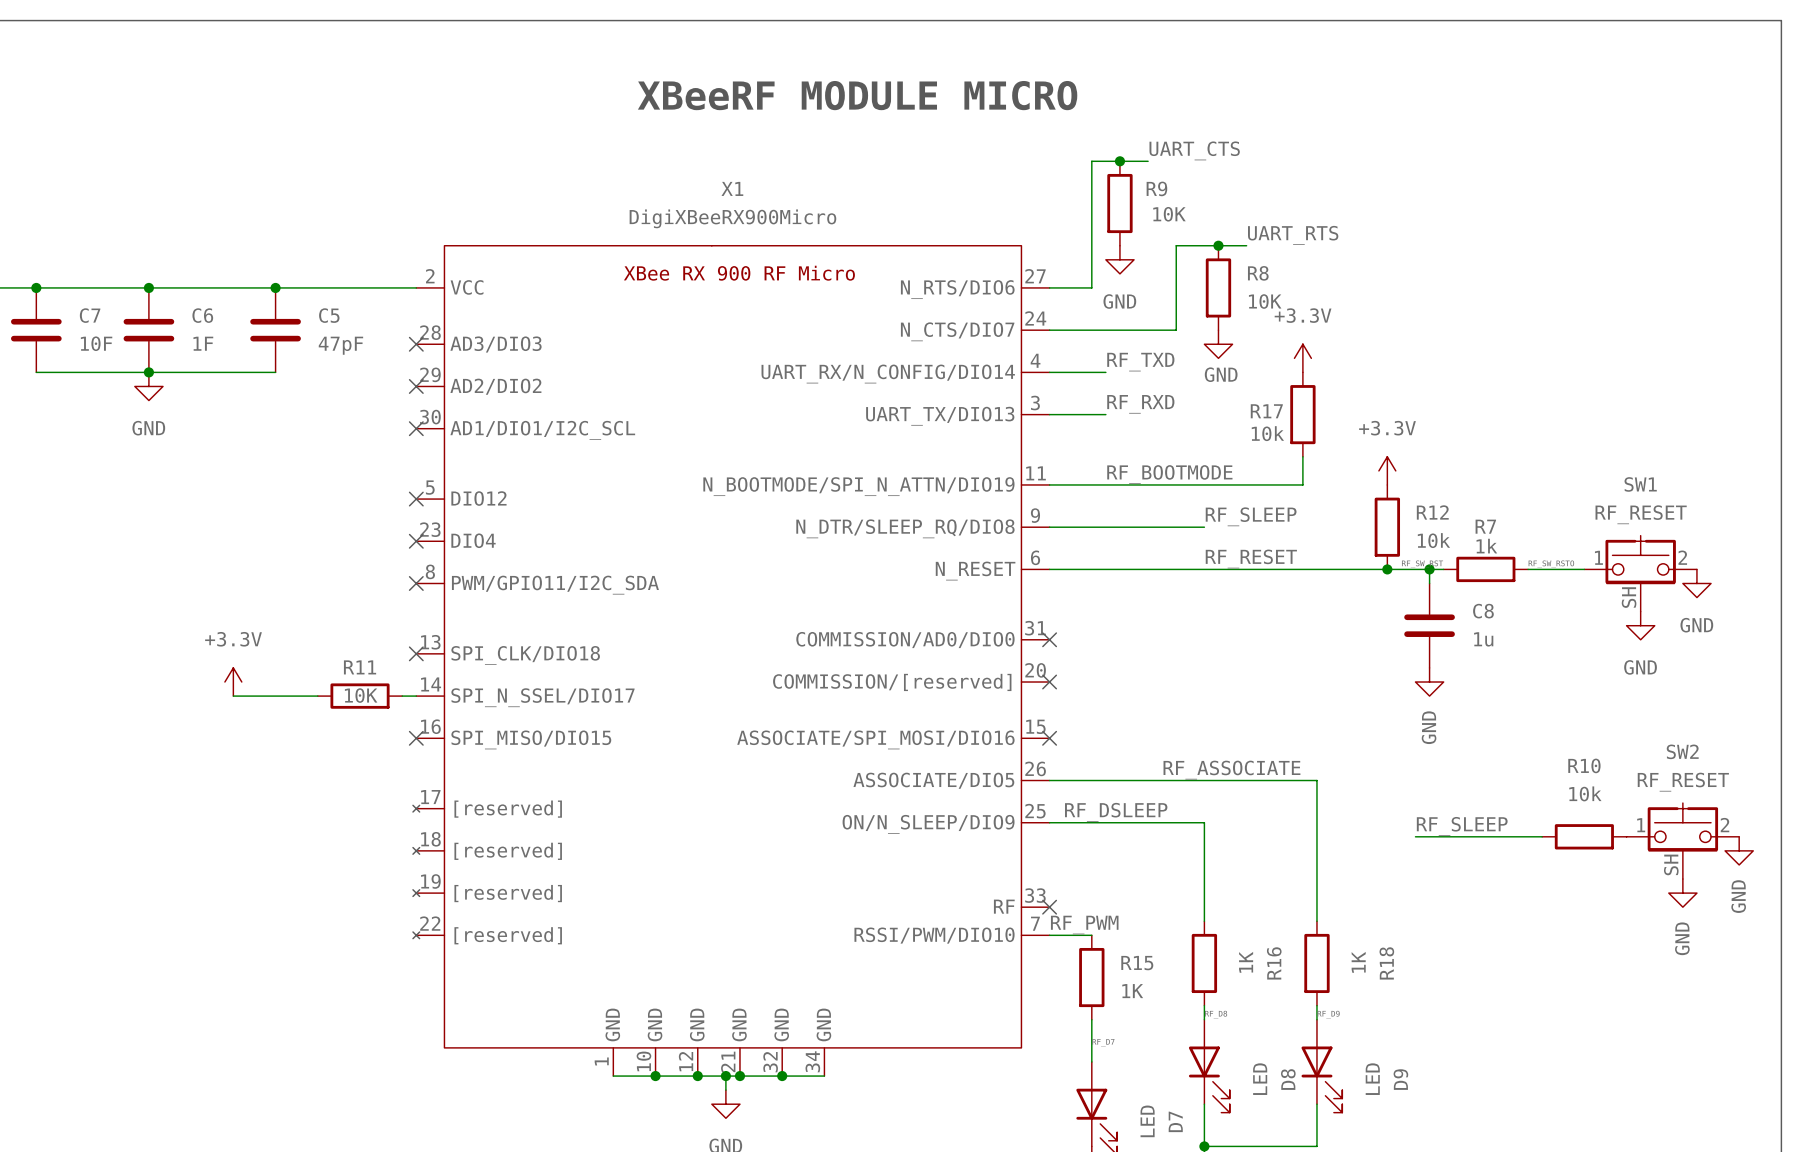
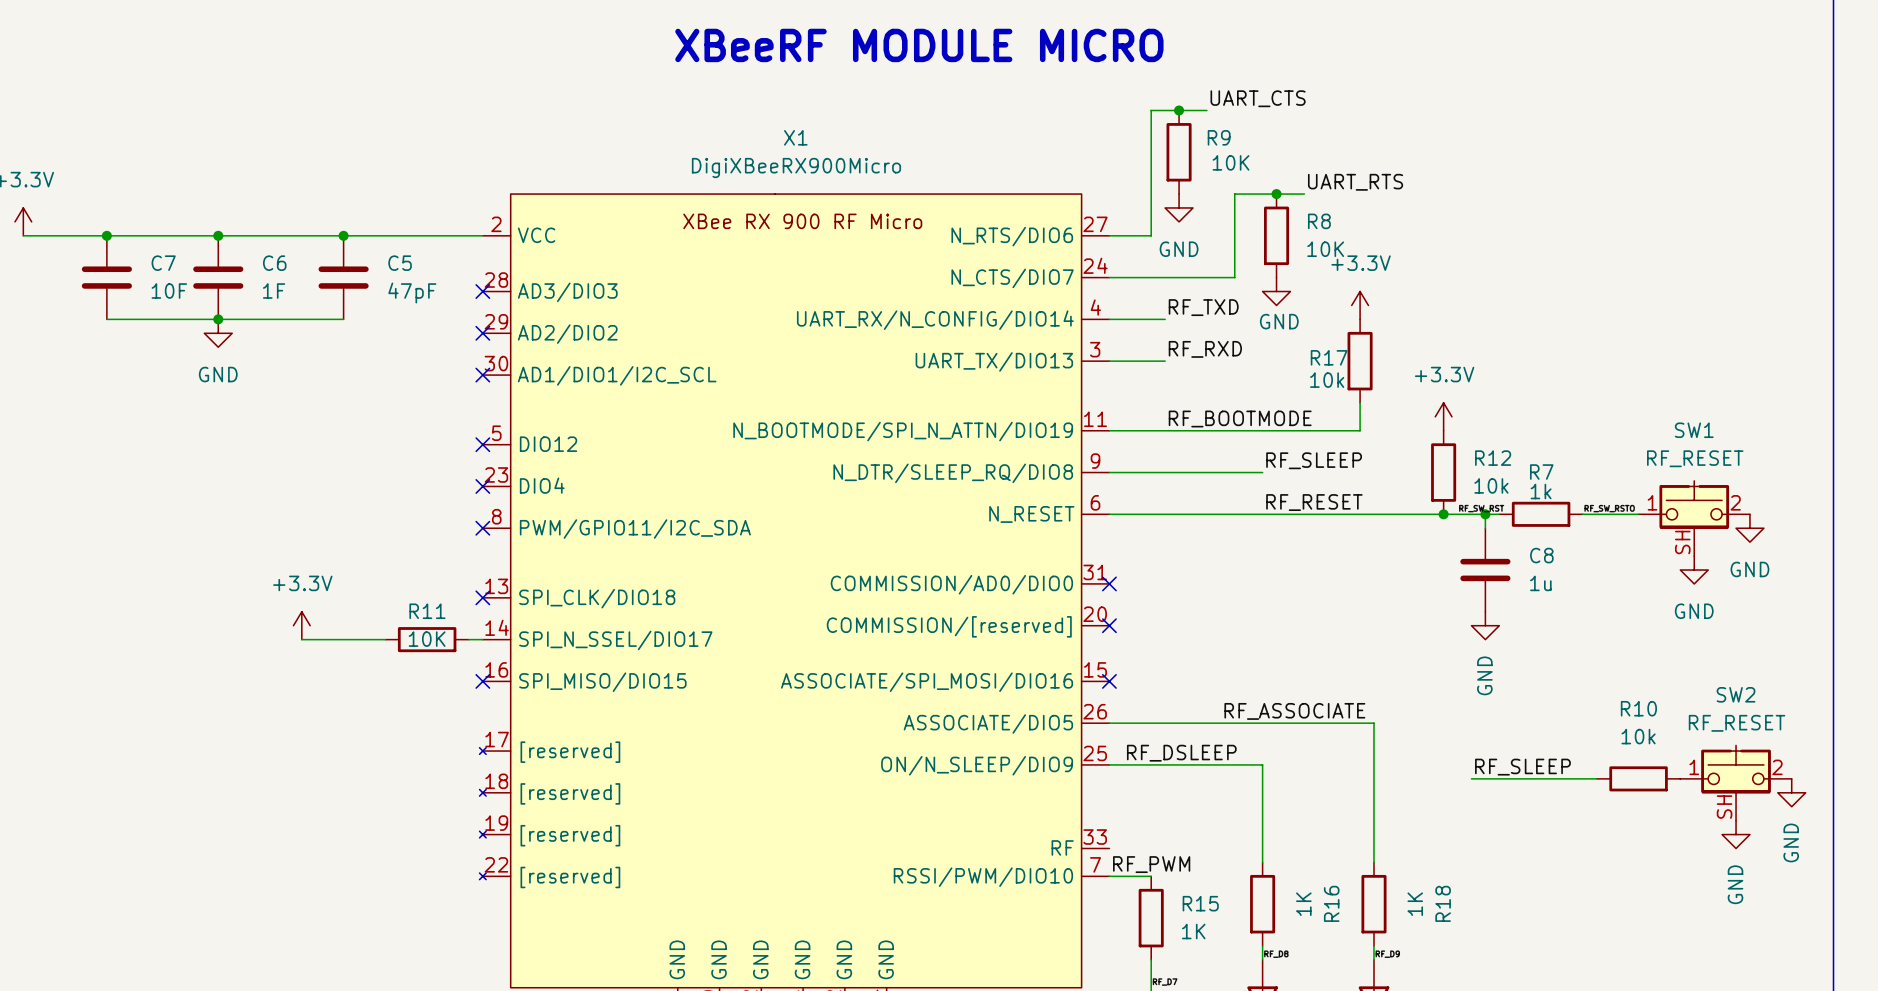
no-connect mark: (1049, 907) -> none

